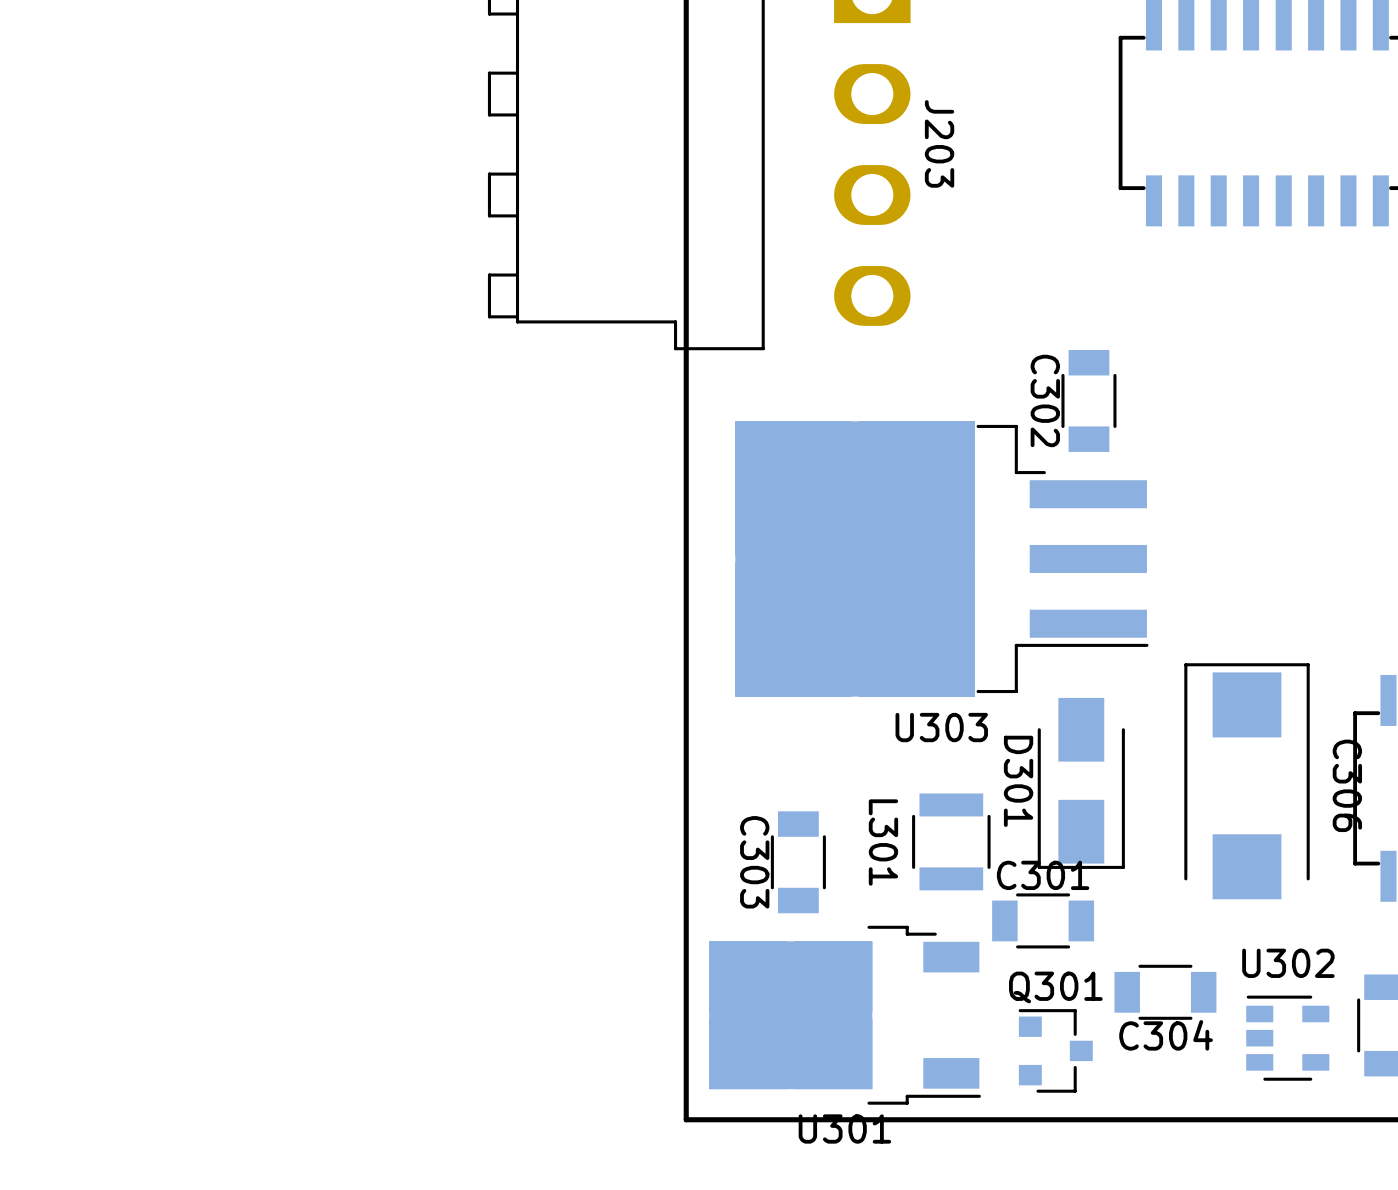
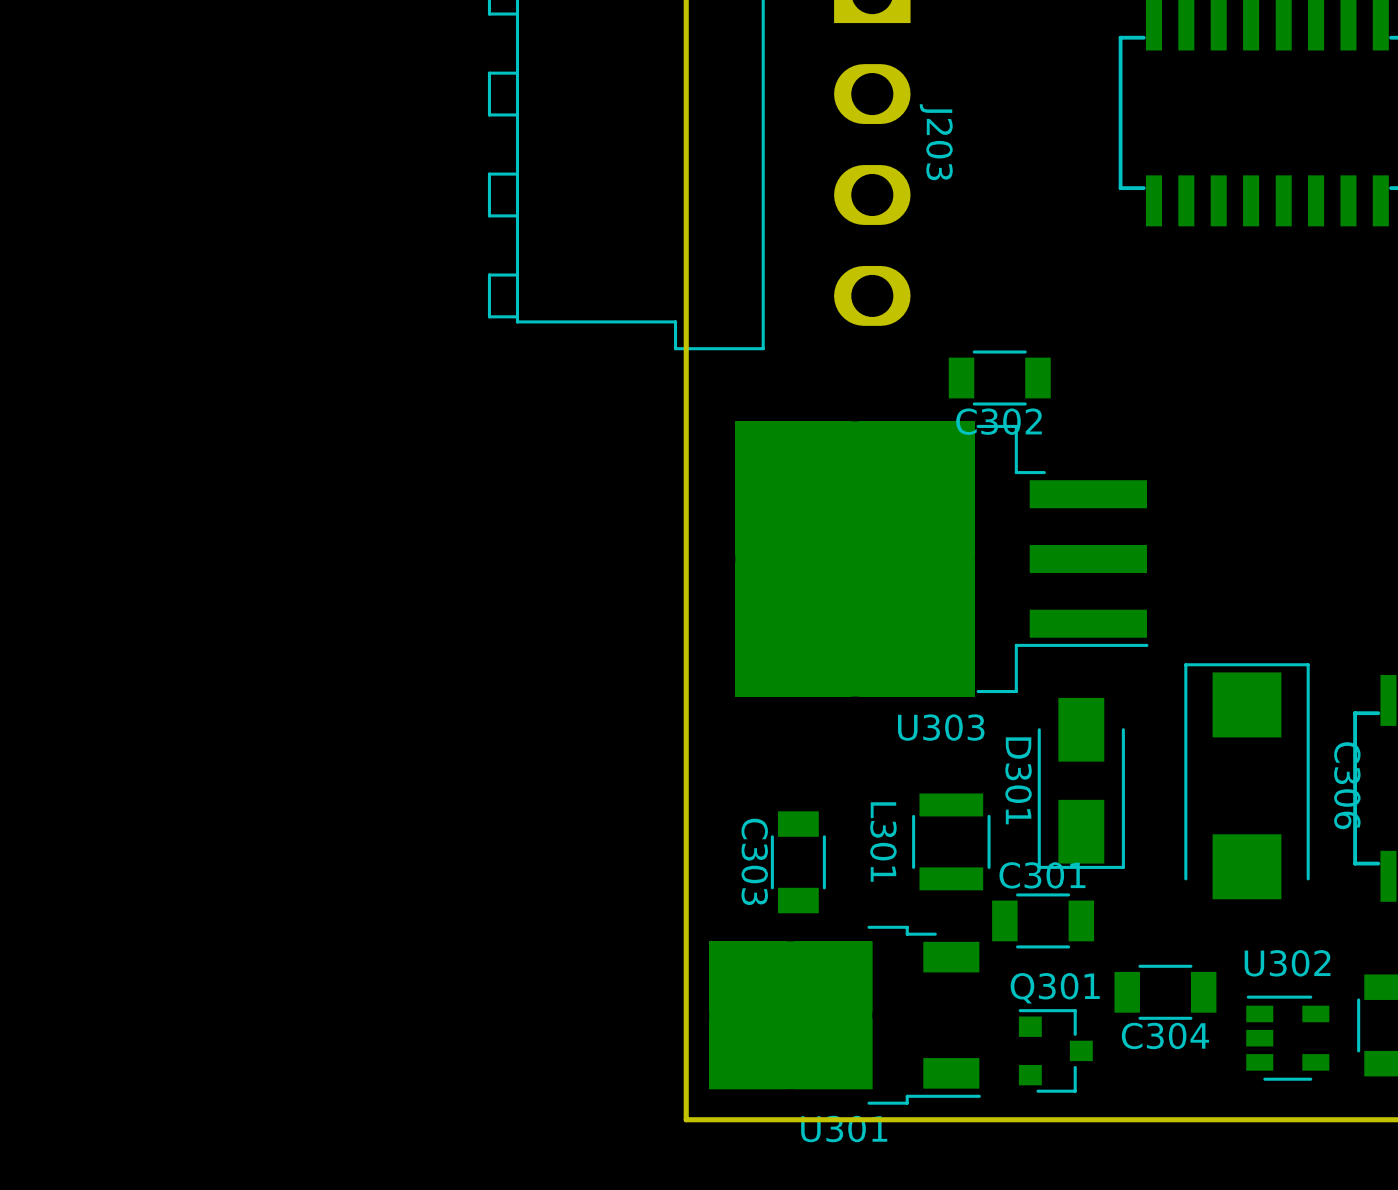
C302 name position: C302 (1045, 400) -> C302 (998, 421)
C302 rotation: 0° (1088, 400) -> 90° clockwise (999, 378)
C302 position: (1088, 400) -> (999, 378)

